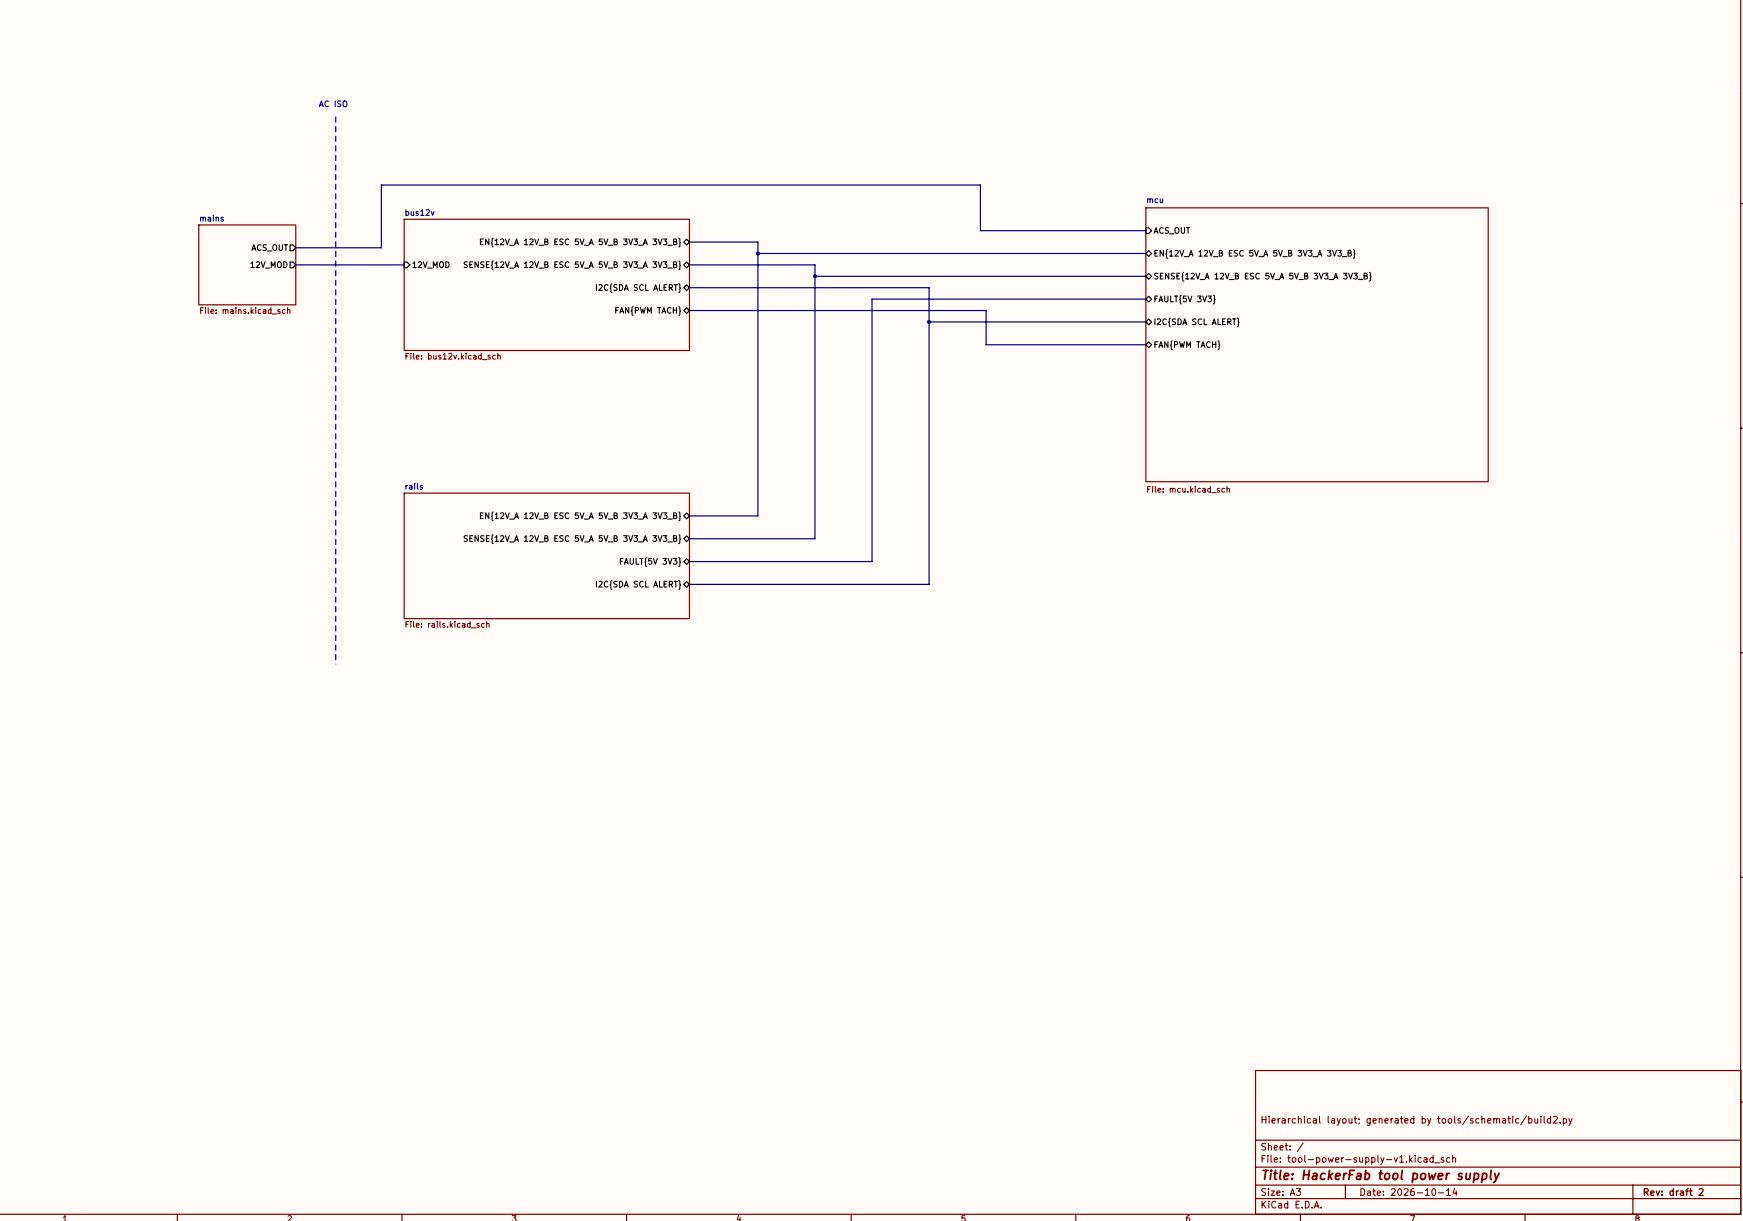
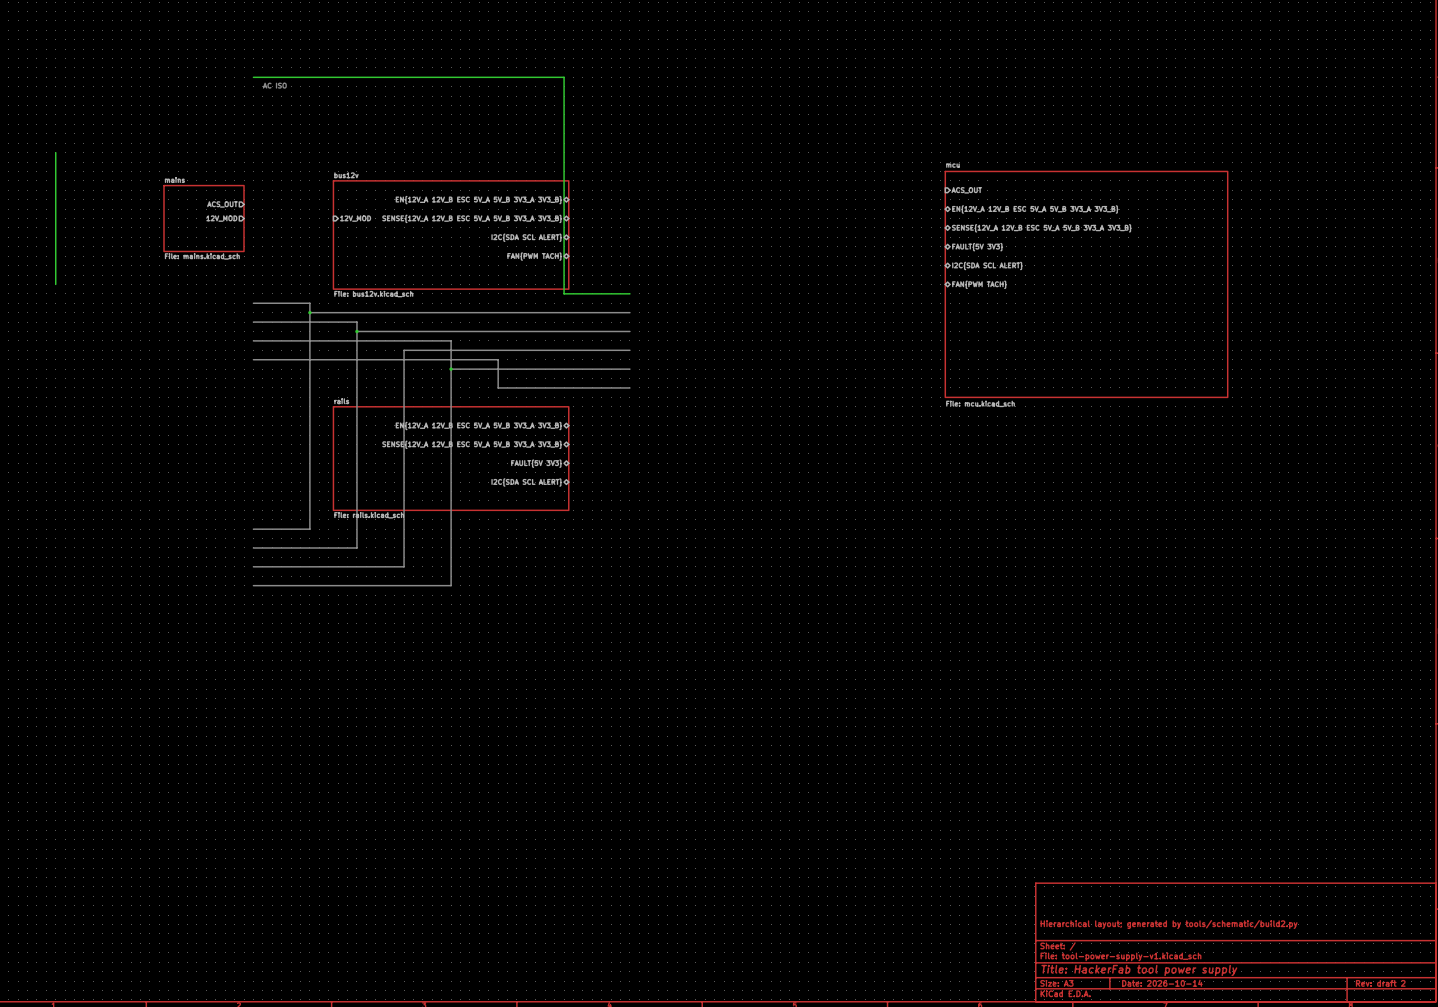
wire: none -> (253, 77) (564, 77) (564, 293) (629, 293)
line: (335, 116) (335, 664) -> none
wire: none -> (55, 152) (55, 284)
wire: (1145, 230) (980, 230) (980, 185) (381, 185) (381, 247) (295, 247) -> none
bus: (689, 242) (757, 242) (757, 515) (689, 515) -> none
bus: (757, 253) (1145, 253) -> none
junction: (757, 253) -> none
wire: (295, 264) (404, 264) -> none
bus: (689, 264) (814, 264) (814, 538) (689, 538) -> none
bus: (814, 276) (1145, 276) -> none
junction: (814, 276) -> none
bus: (689, 287) (929, 287) (929, 584) (689, 584) -> none
bus: (1145, 299) (872, 299) (872, 561) (689, 561) -> none
bus: (689, 310) (986, 310) (986, 344) (1145, 344) -> none
bus: (929, 321) (1145, 321) -> none
junction: (929, 321) -> none
bus: none -> (253, 303) (309, 303) (309, 529) (253, 529)
bus: none -> (309, 312) (629, 312)
junction: none -> (309, 312)
bus: none -> (253, 322) (356, 322) (356, 547) (253, 547)
bus: none -> (356, 331) (629, 331)
junction: none -> (356, 331)
bus: none -> (253, 340) (451, 340) (451, 585) (253, 585)
bus: none -> (629, 350) (404, 350) (404, 566) (253, 566)
bus: none -> (253, 359) (498, 359) (498, 387) (629, 387)
bus: none -> (451, 369) (629, 369)
junction: none -> (451, 369)

